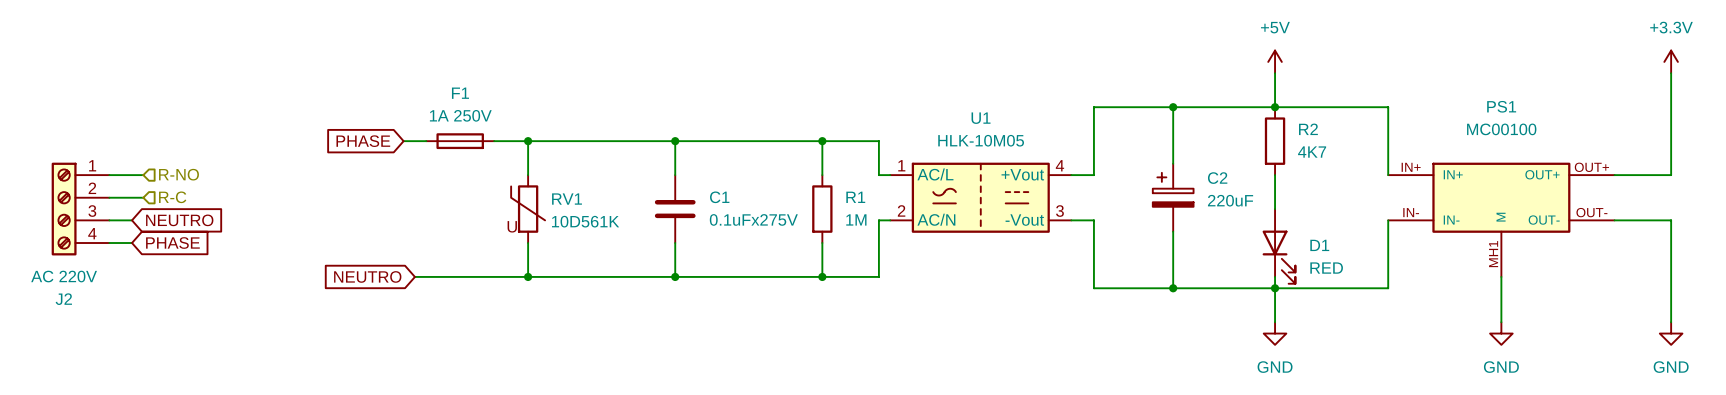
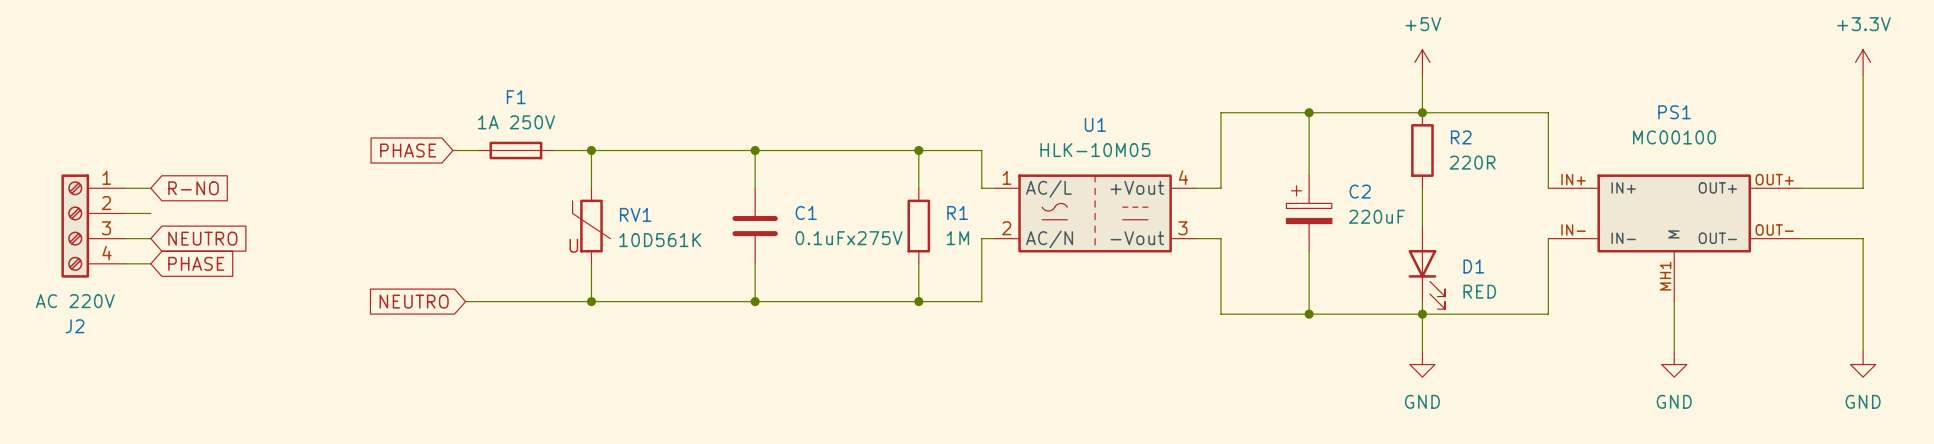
R2 value: 4K7 (1312, 152) -> 220R (1472, 162)
hierarchical label: R-NO (179, 174) -> none
wire: (132, 175) (143, 175) -> none
global label: none -> R-NO (193, 188)
wire: (132, 197) (143, 197) -> none
hierarchical label: R-C (172, 197) -> none

